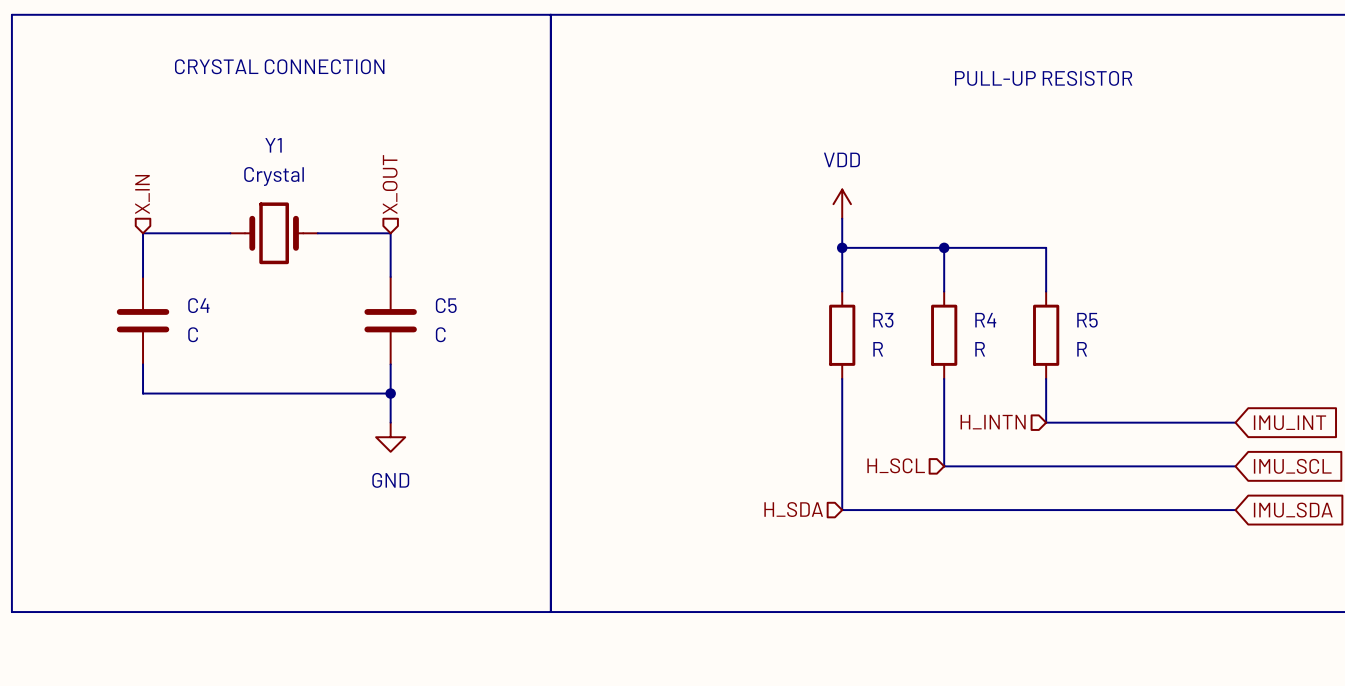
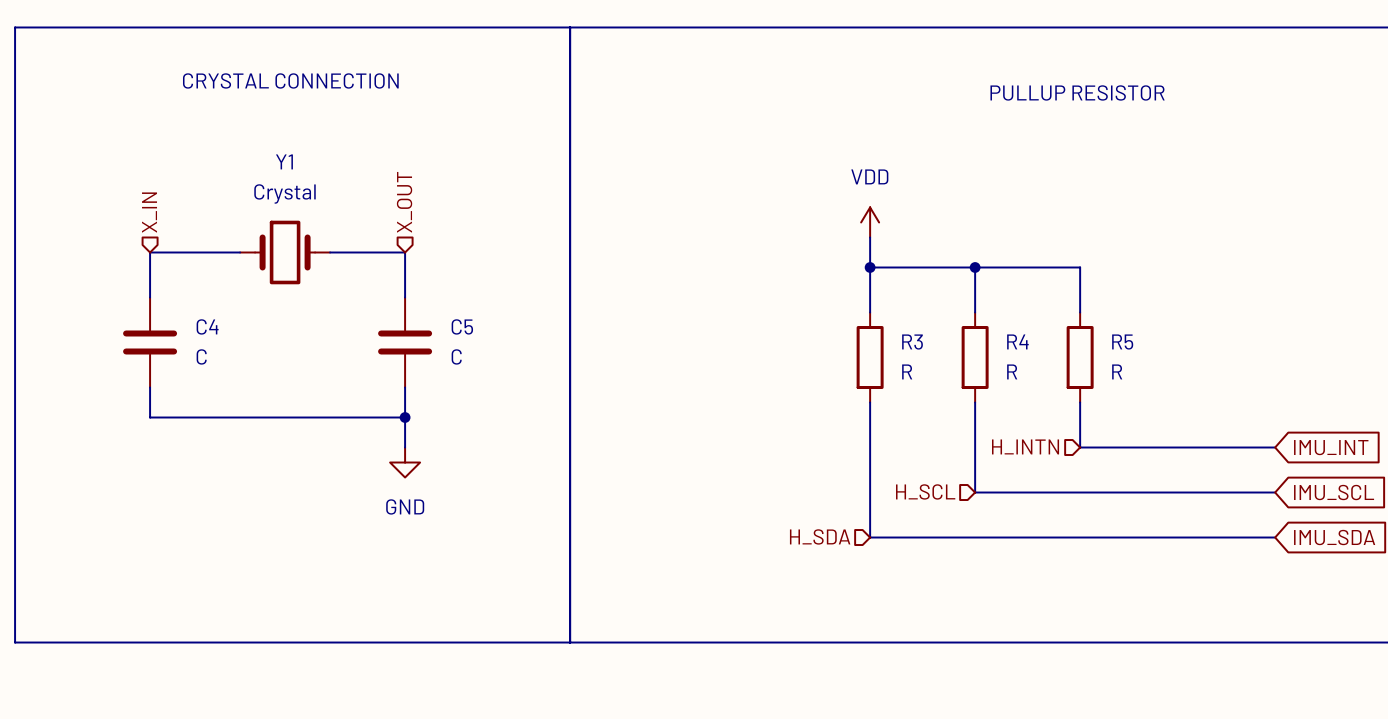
text: PULL-UP RESISTOR (1043, 78) -> PULLUP RESISTOR (1077, 92)

